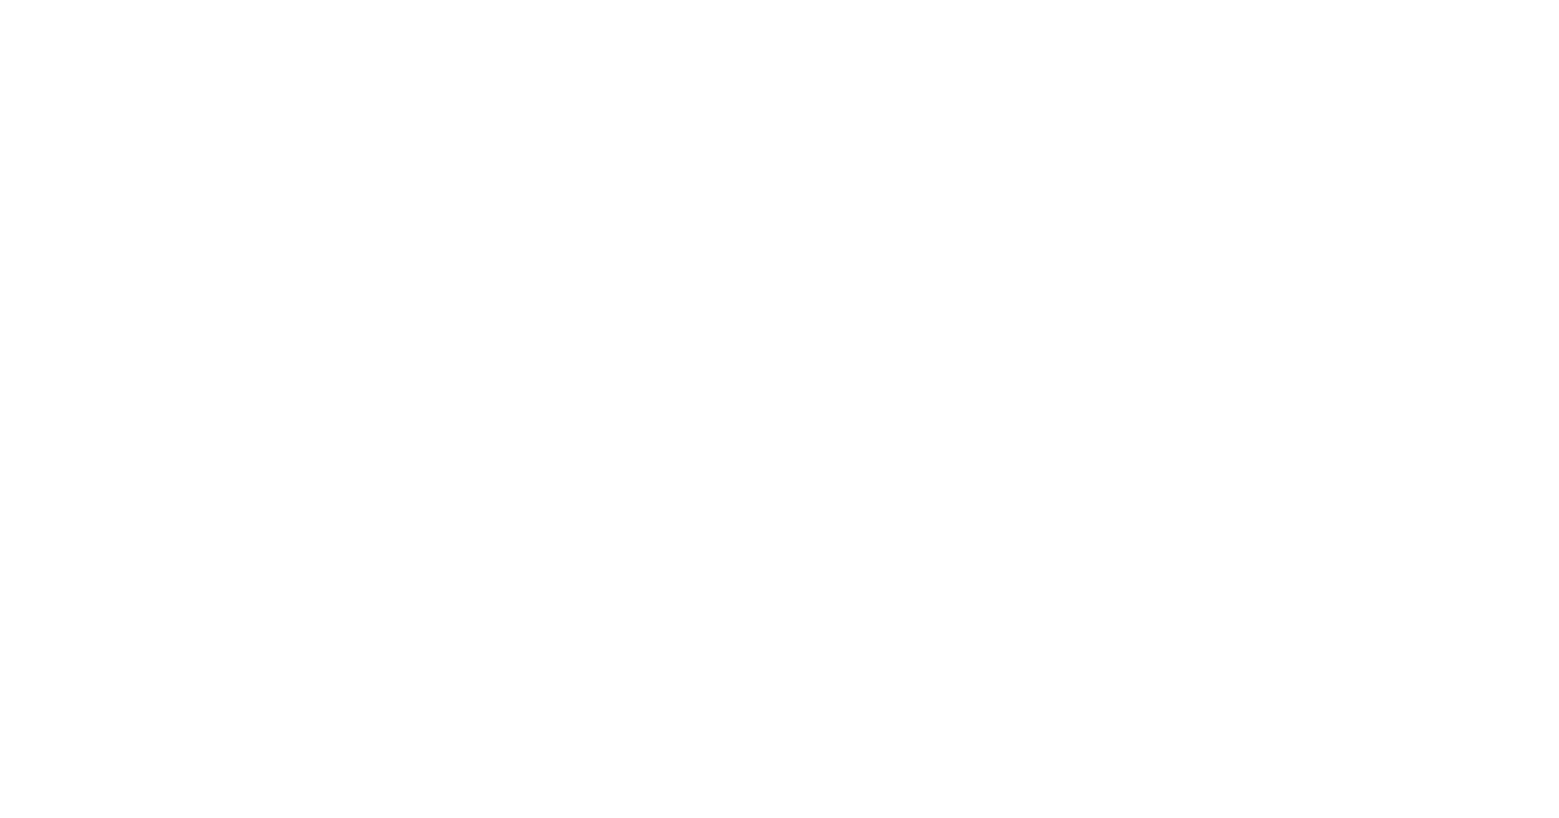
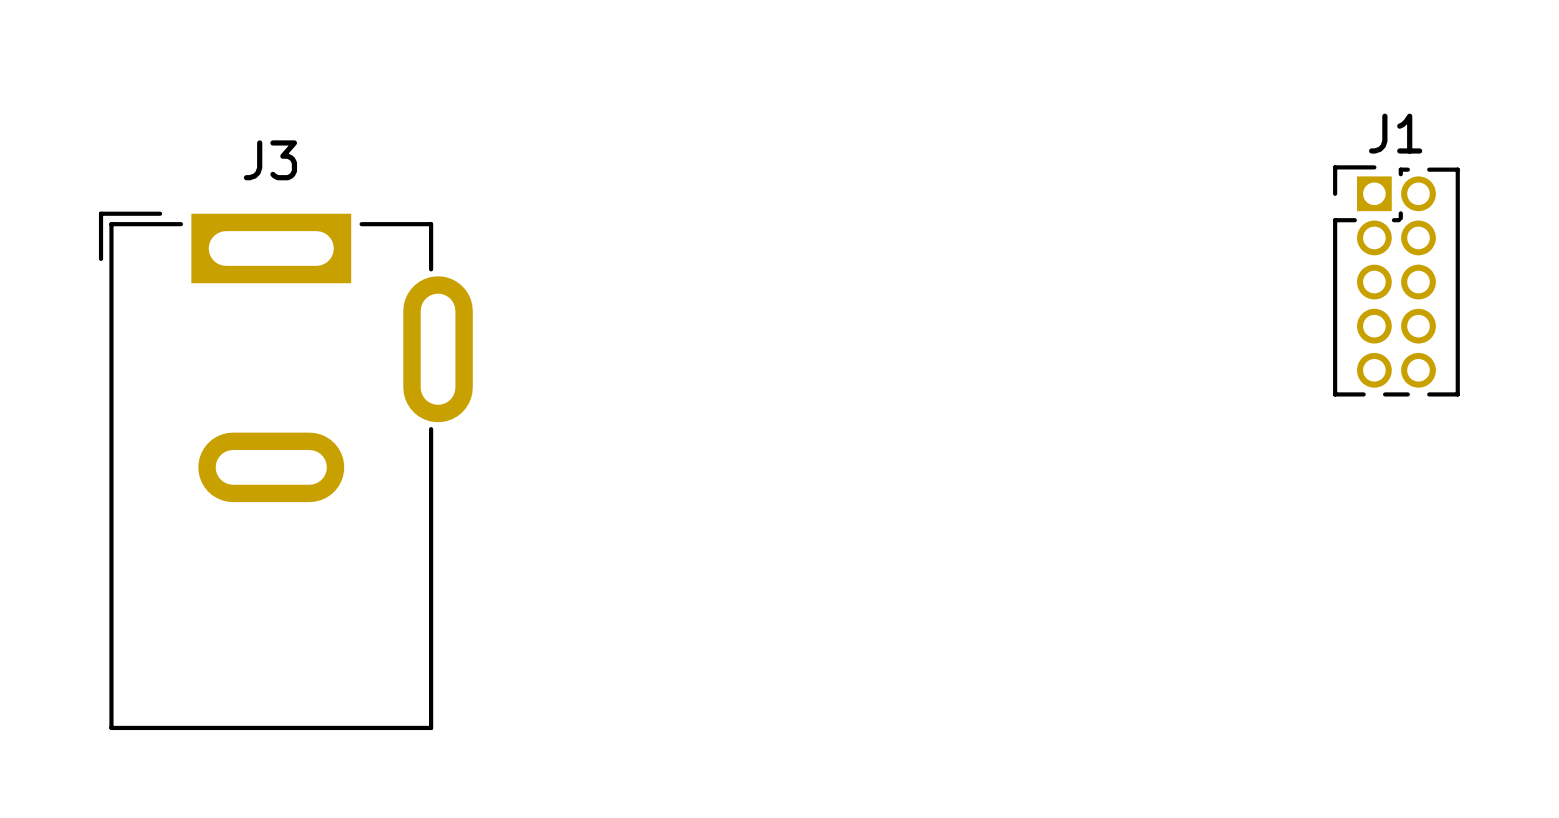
J1: none -> (1396, 280)
J3: none -> (285, 470)

